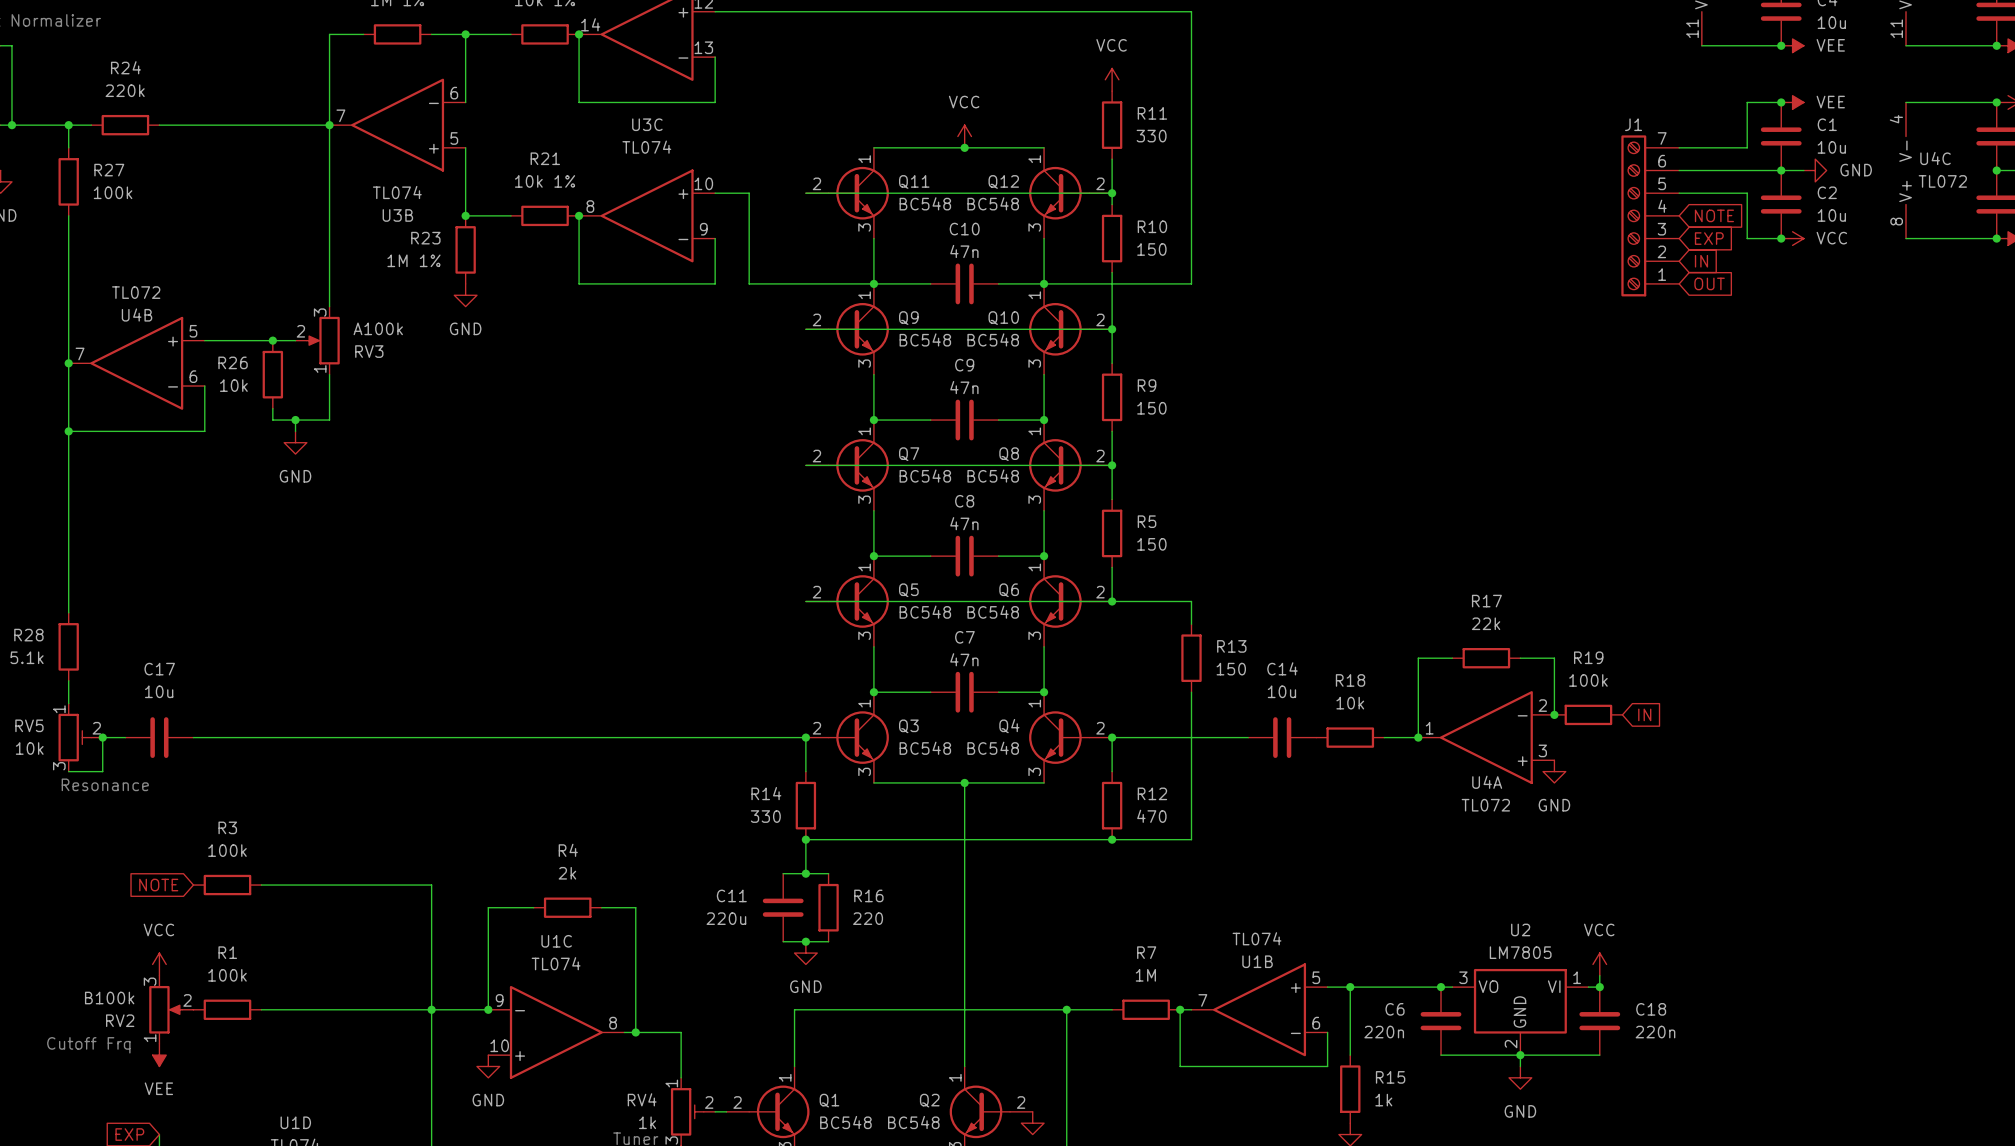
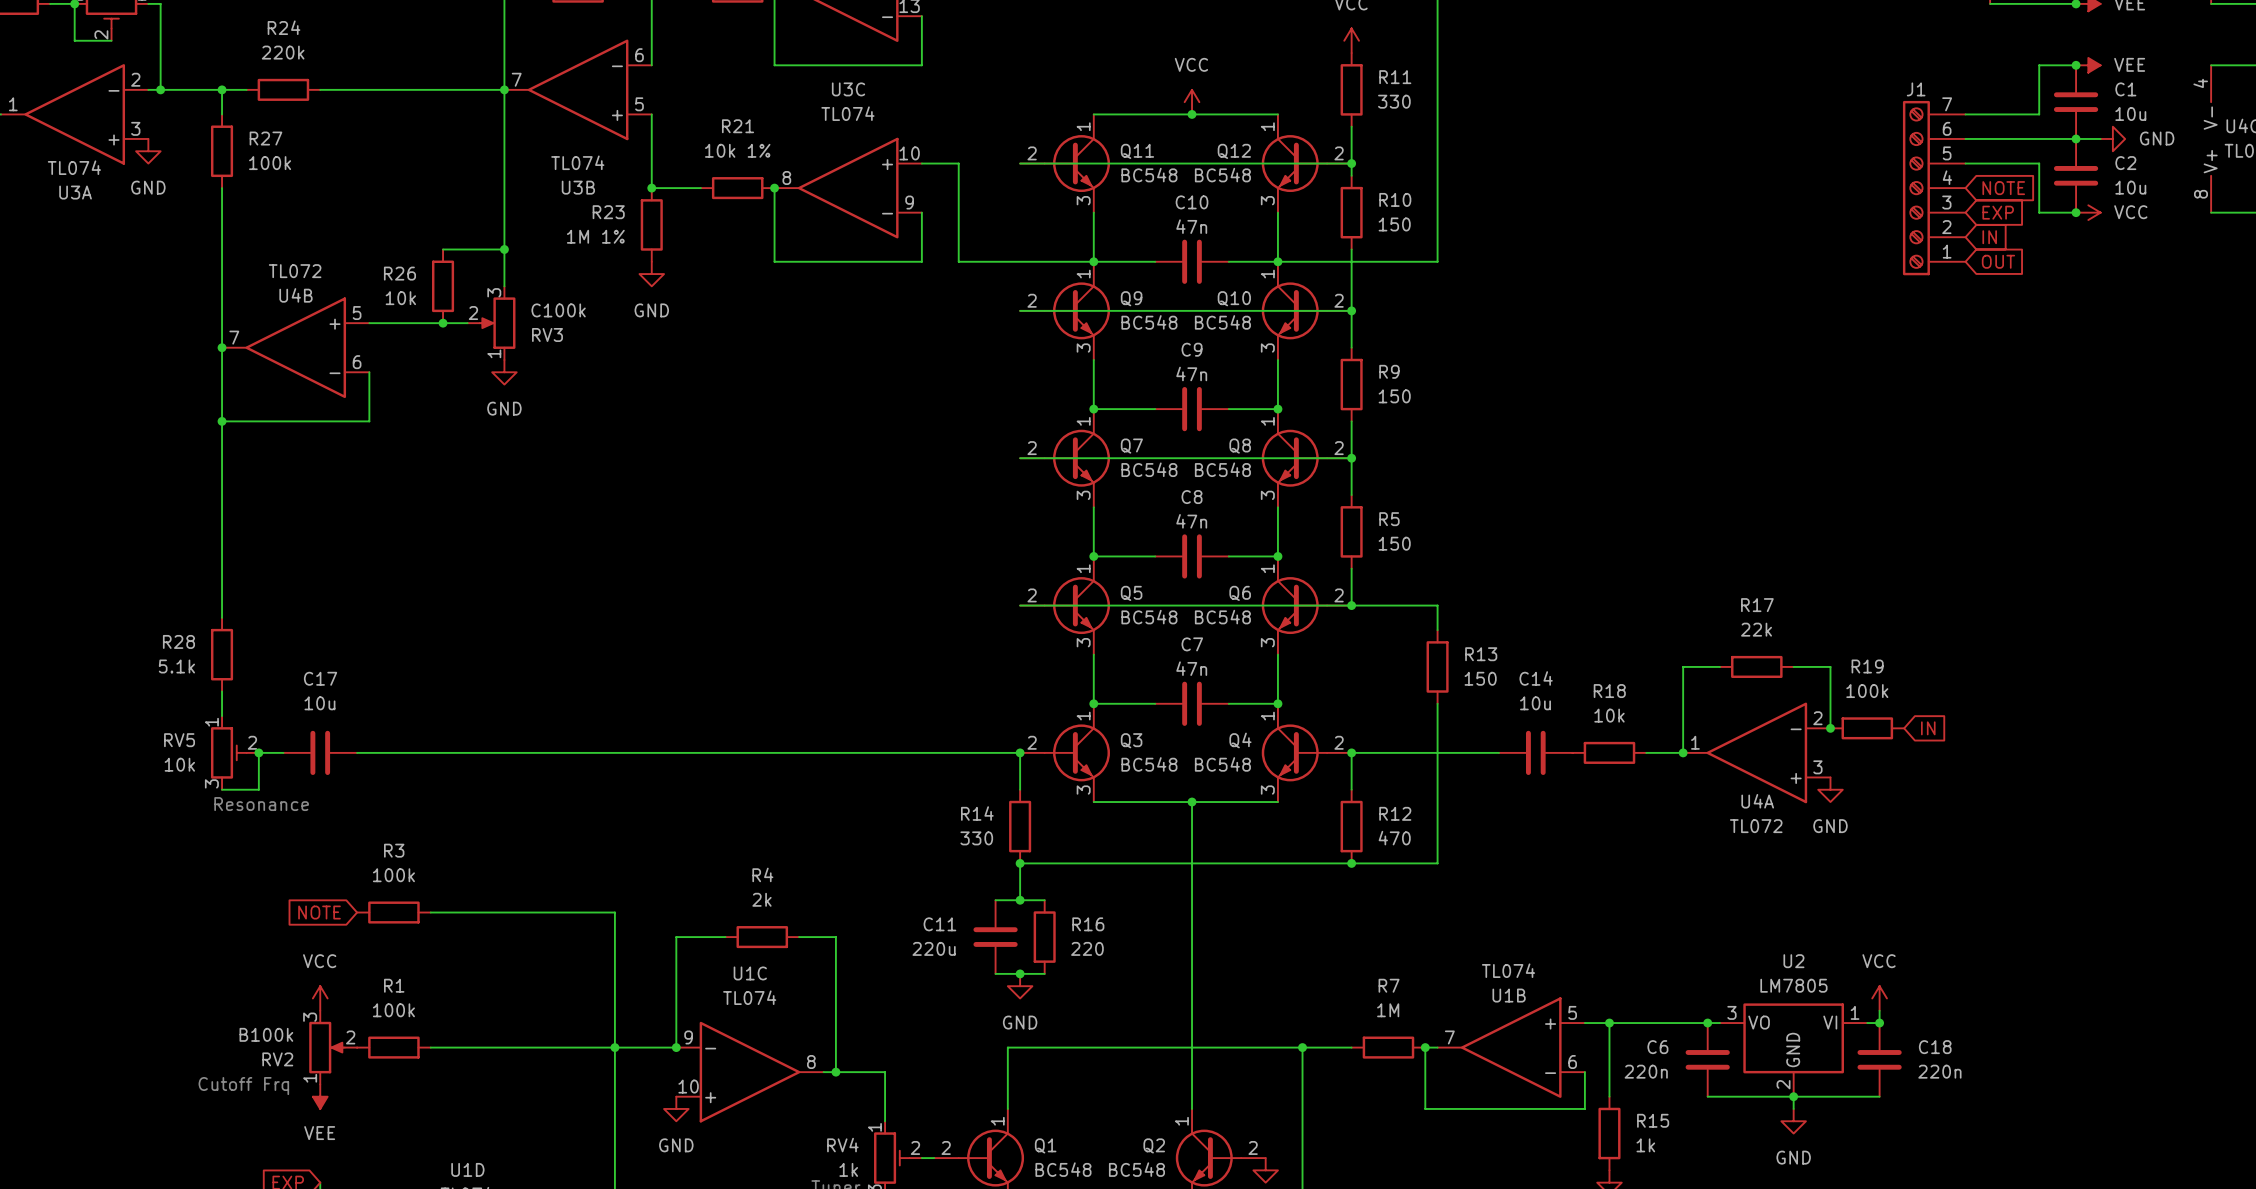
wire: none -> (443, 249) (504, 249)
junction: none -> (504, 249)
RV3 value: A100k (378, 328) -> C100k (558, 310)
R26 position: (272, 374) -> (443, 286)
wire: (329, 374) (329, 420) (272, 420) (272, 408) -> none
wire: (295, 420) (295, 431) -> none
junction: (295, 420) -> none
power symbol position: GND (295, 442) -> GND (504, 372)

